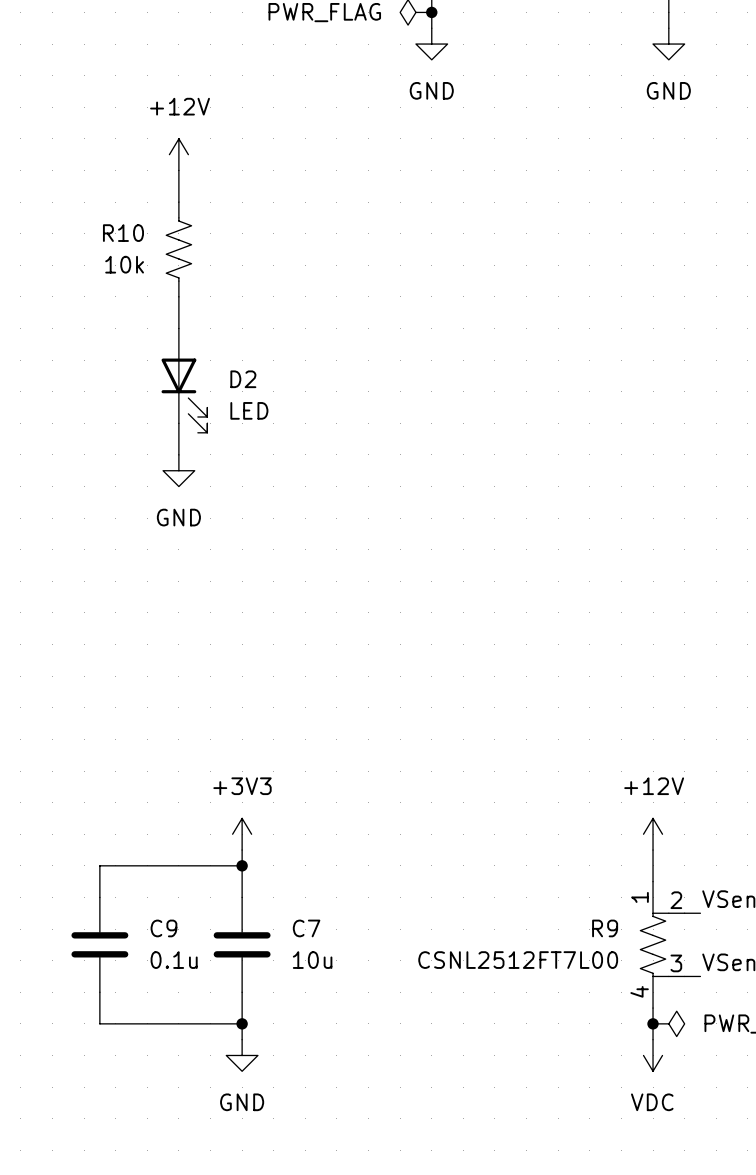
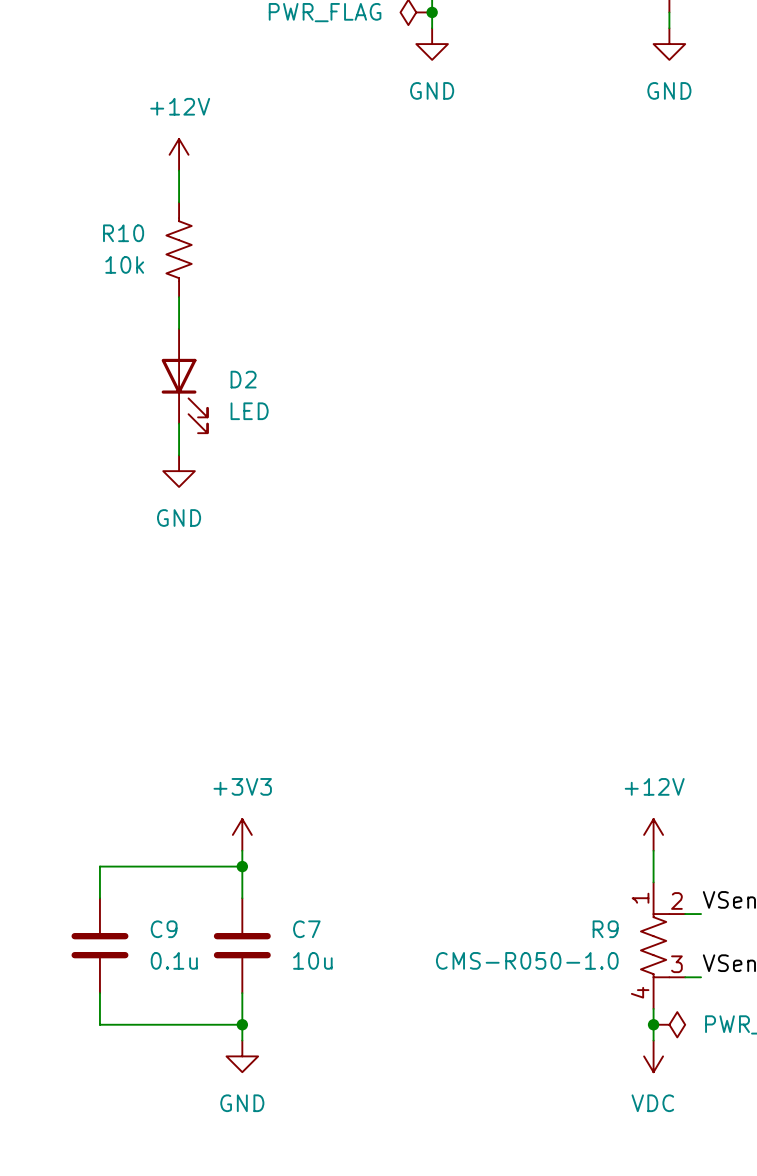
R9 value: CSNL2512FT7L00 (518, 960) -> CMS-R050-1.0 (527, 960)

